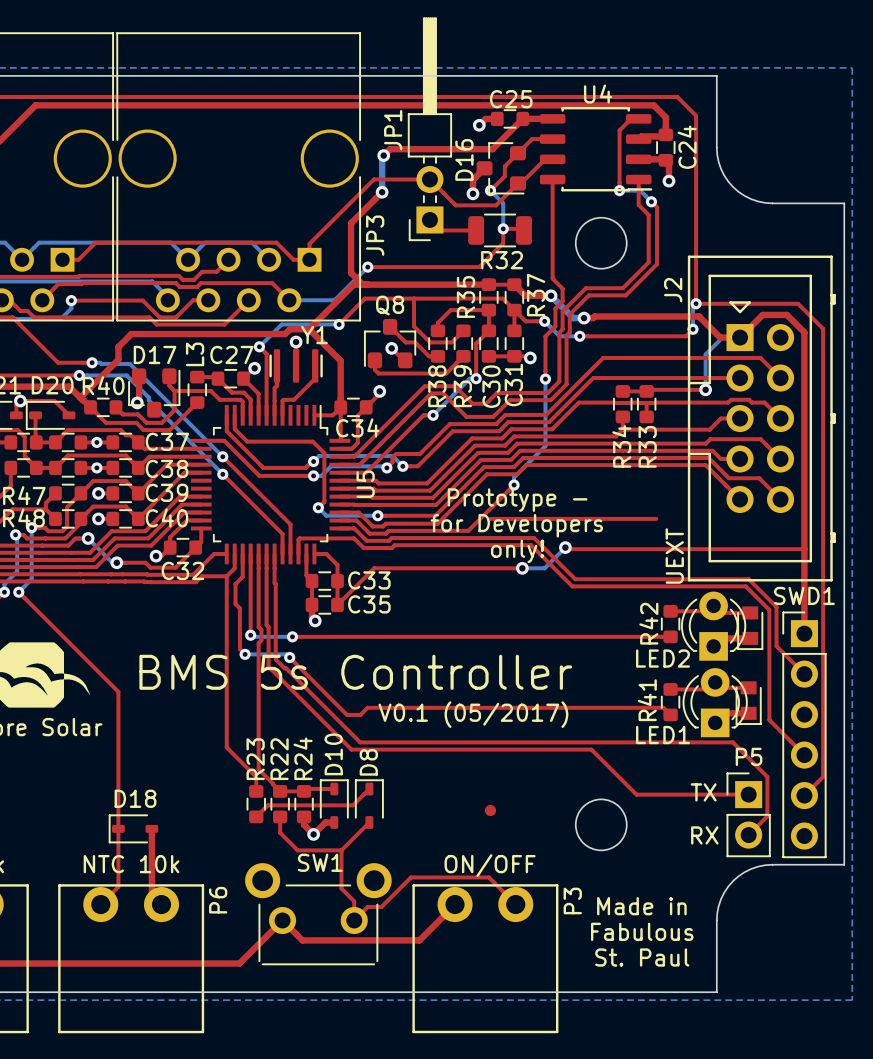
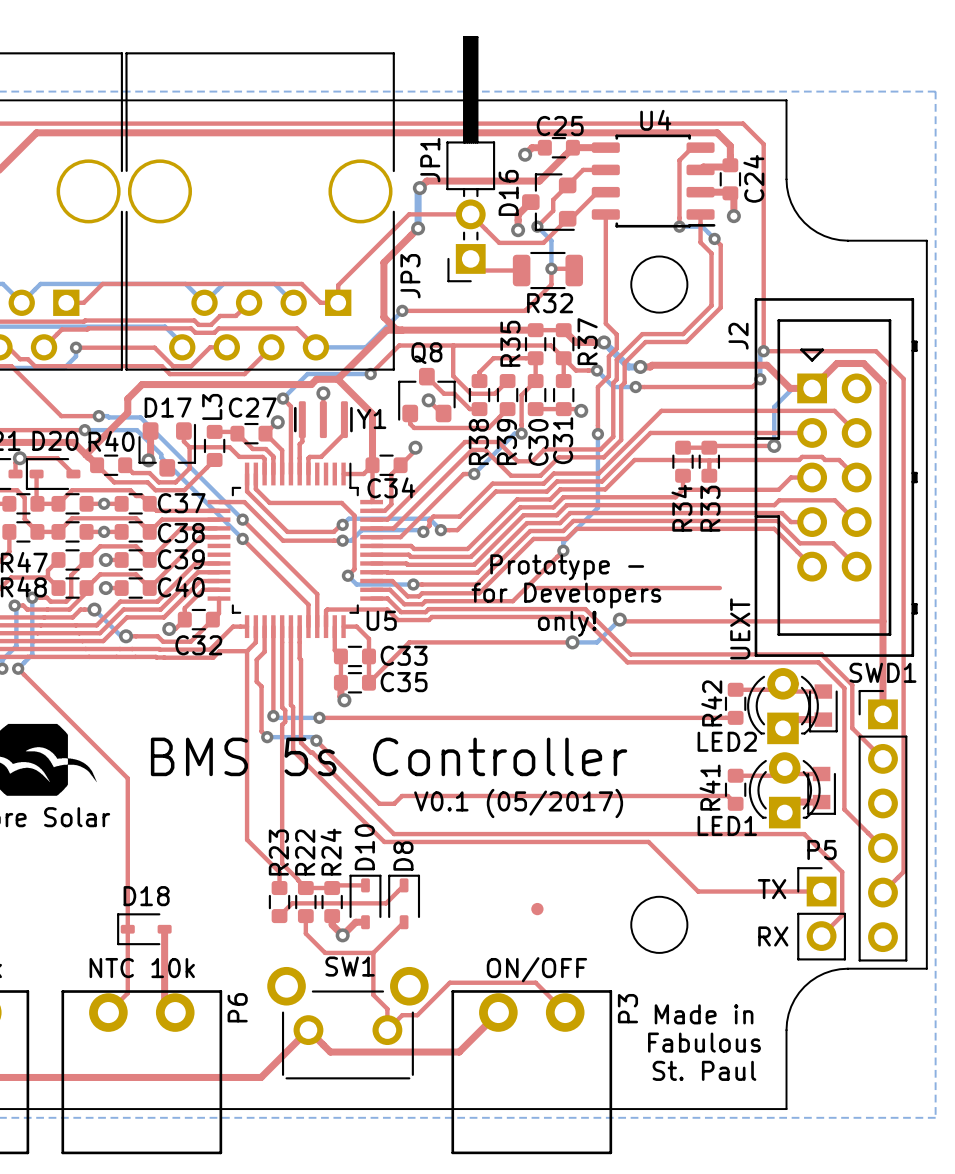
Y1 name position: Y1 (314, 335) -> Y1 (371, 418)
U5 name rotation: 0° (365, 484) -> 90° clockwise (381, 620)
U5 name position: U5 (365, 484) -> U5 (381, 620)

